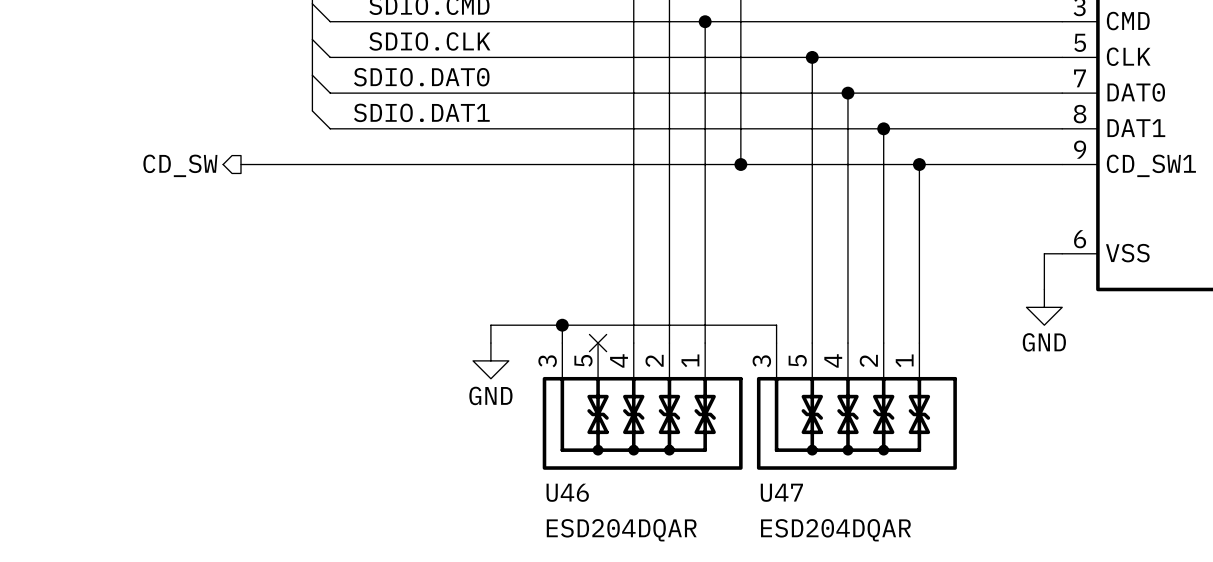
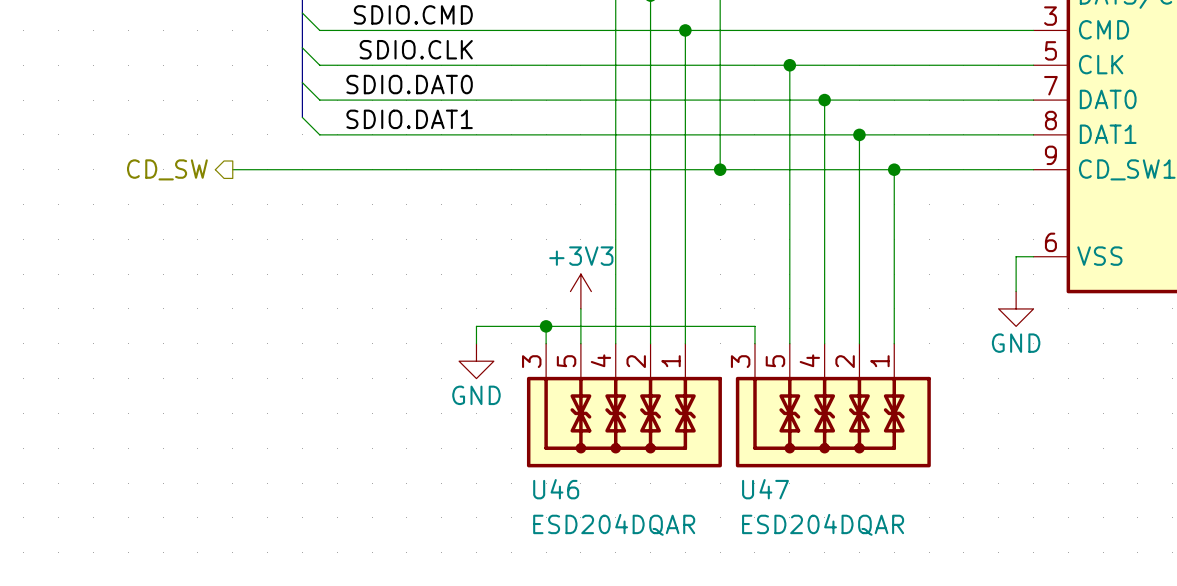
power symbol: none -> +3V3 (580, 291)
wire: none -> (580, 308) (580, 343)
no-connect mark: (598, 343) -> none

